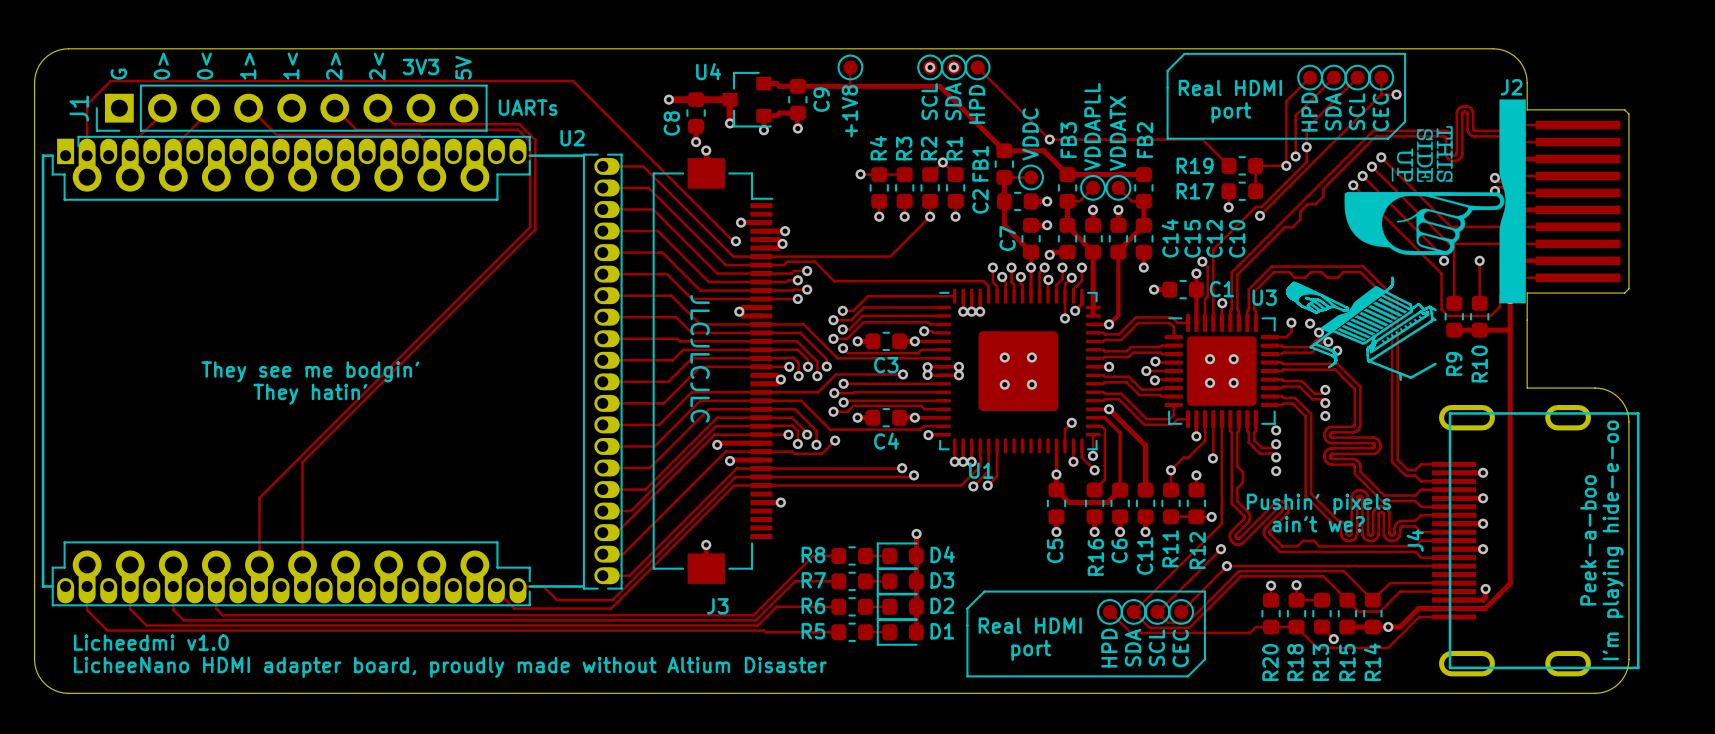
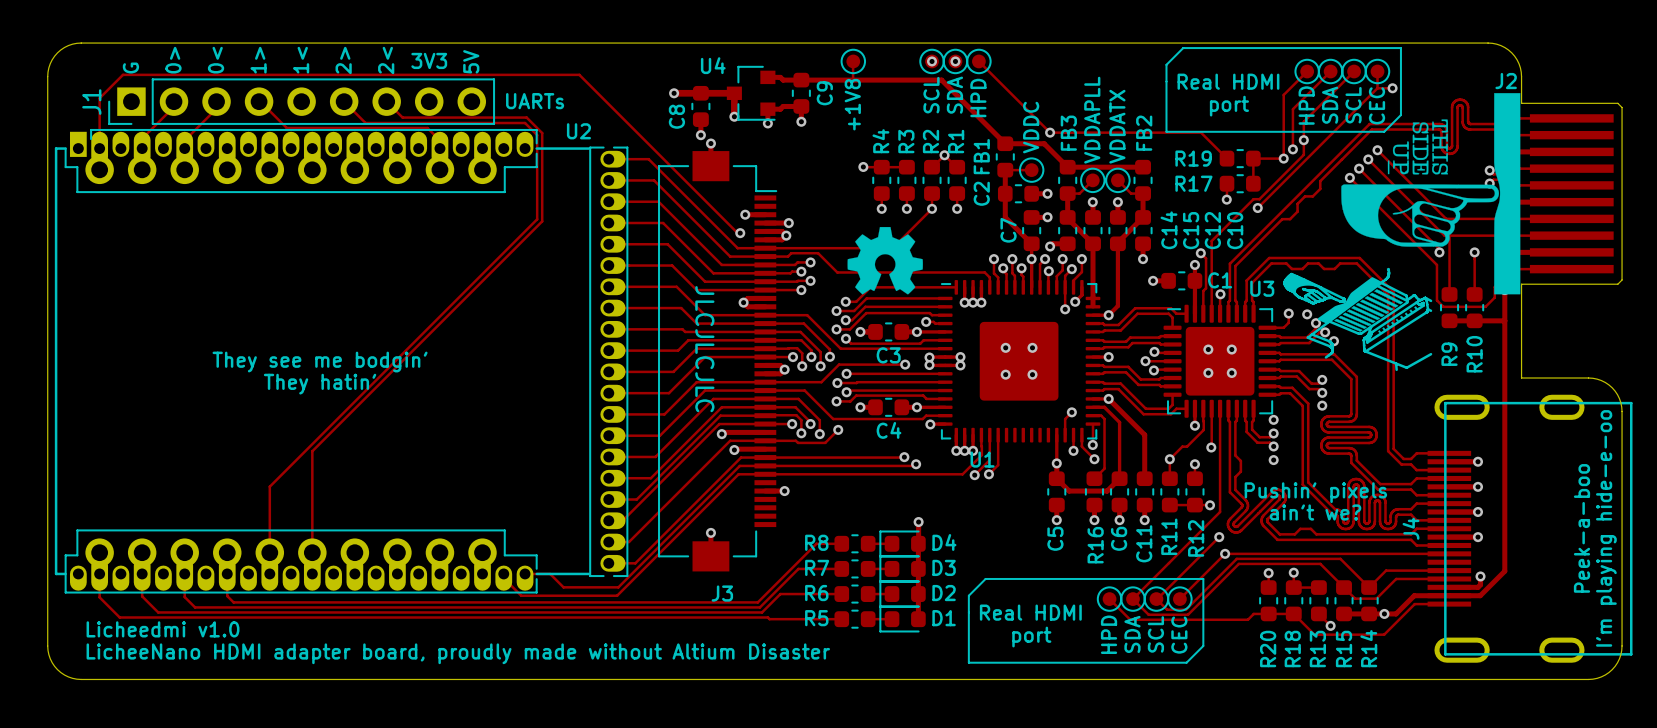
drawing: none -> [847, 226, 923, 295]

